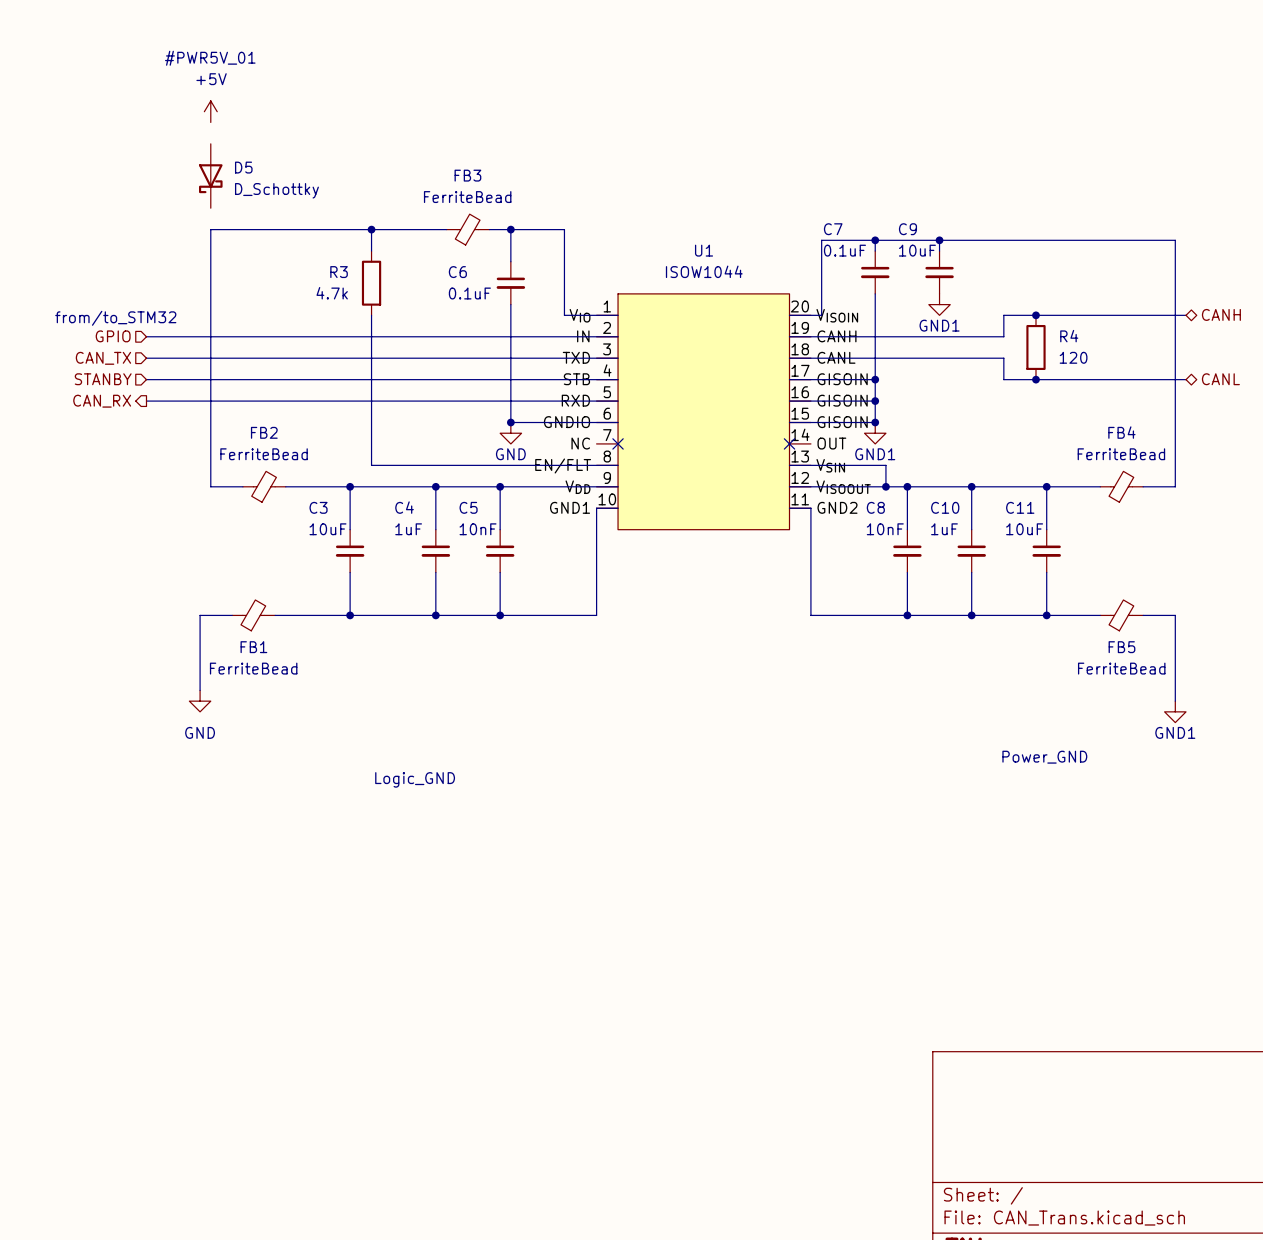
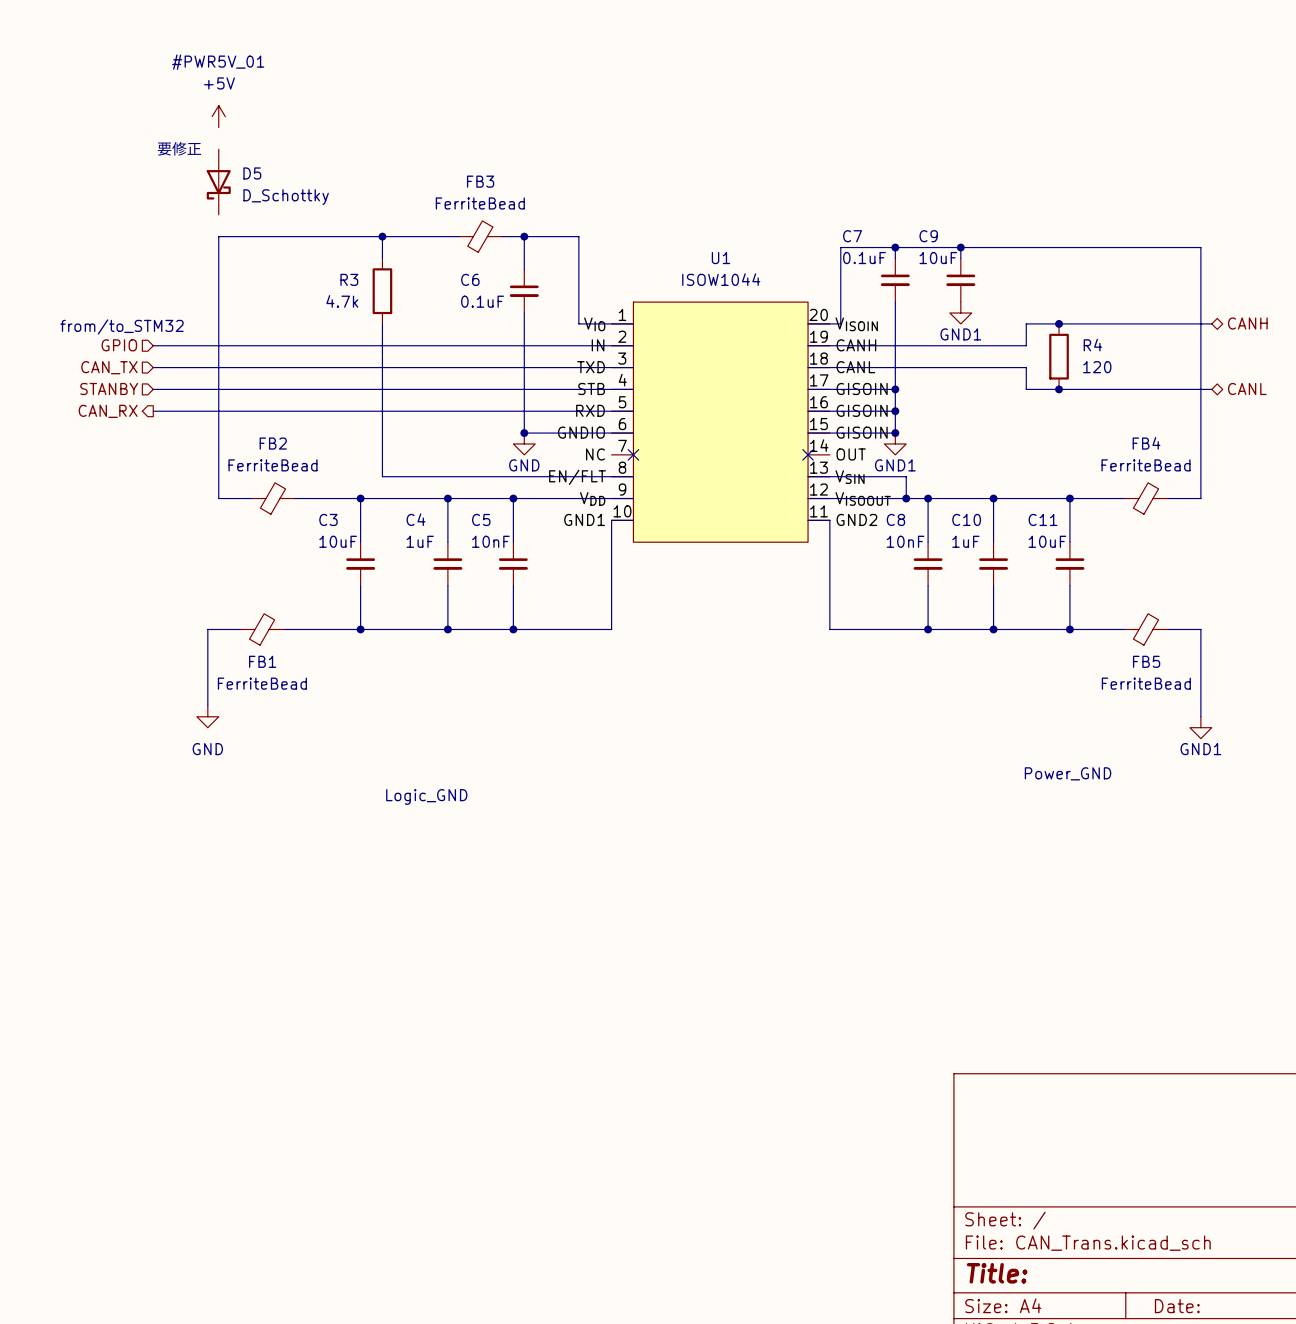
text: none -> 要修正 (179, 148)

